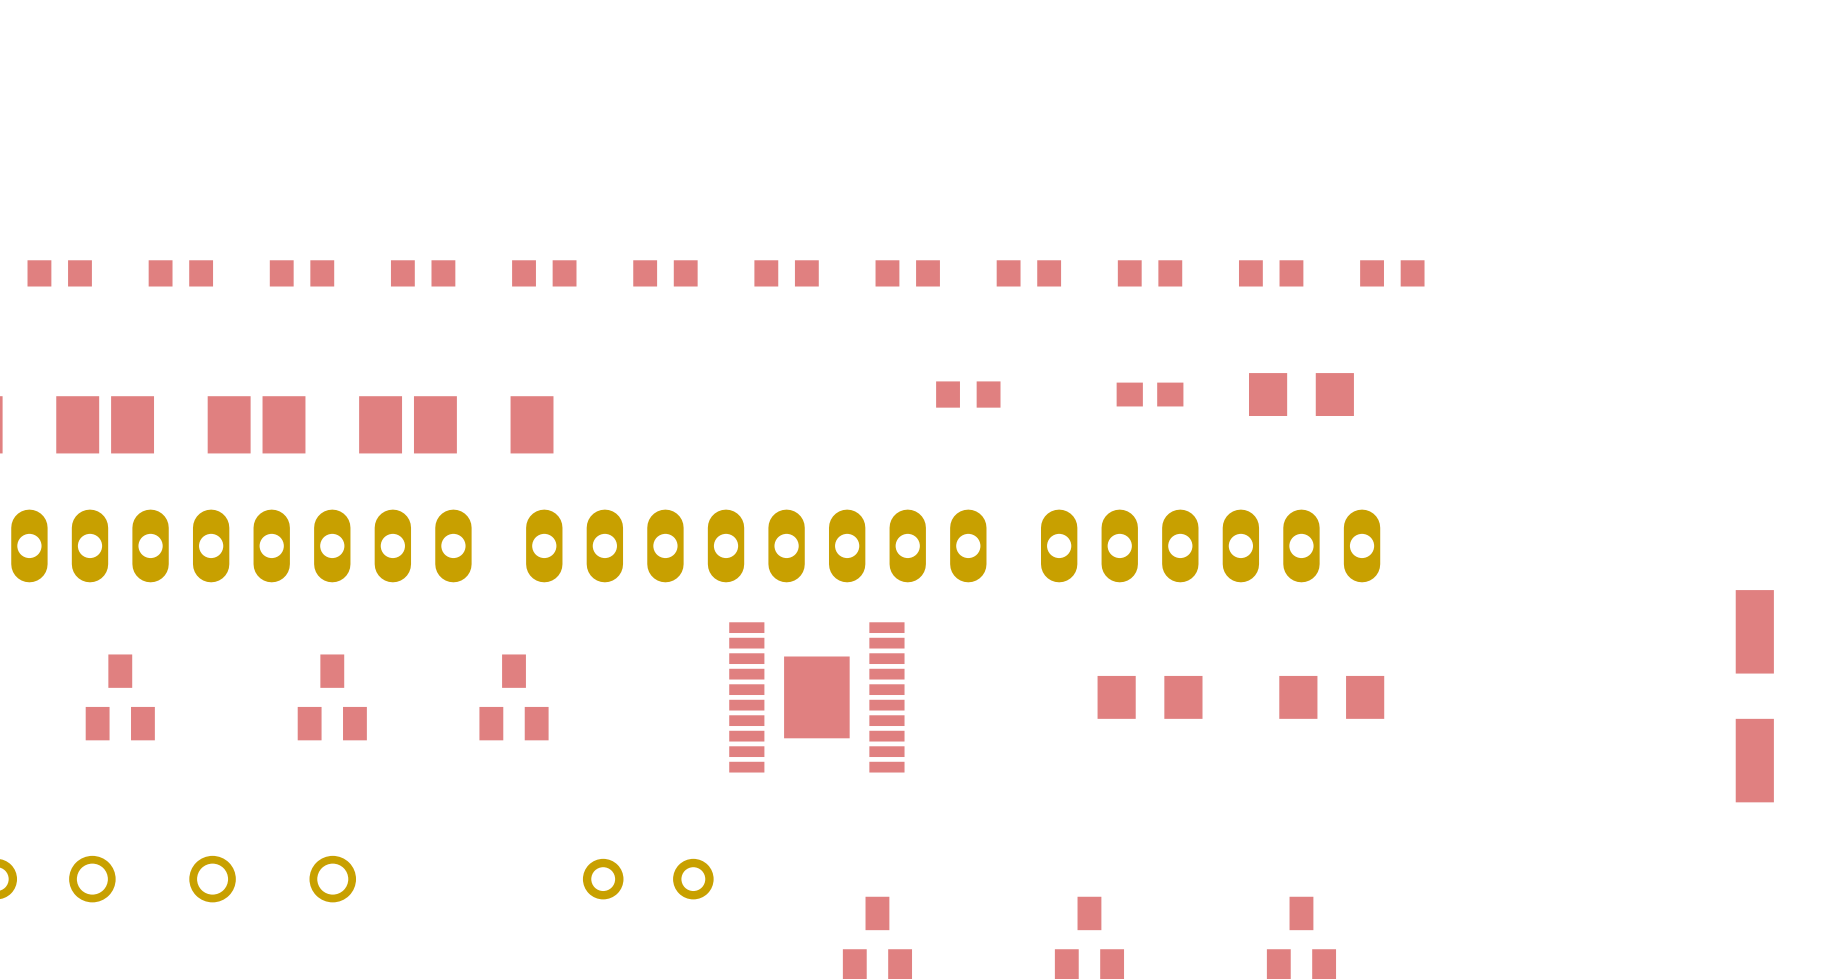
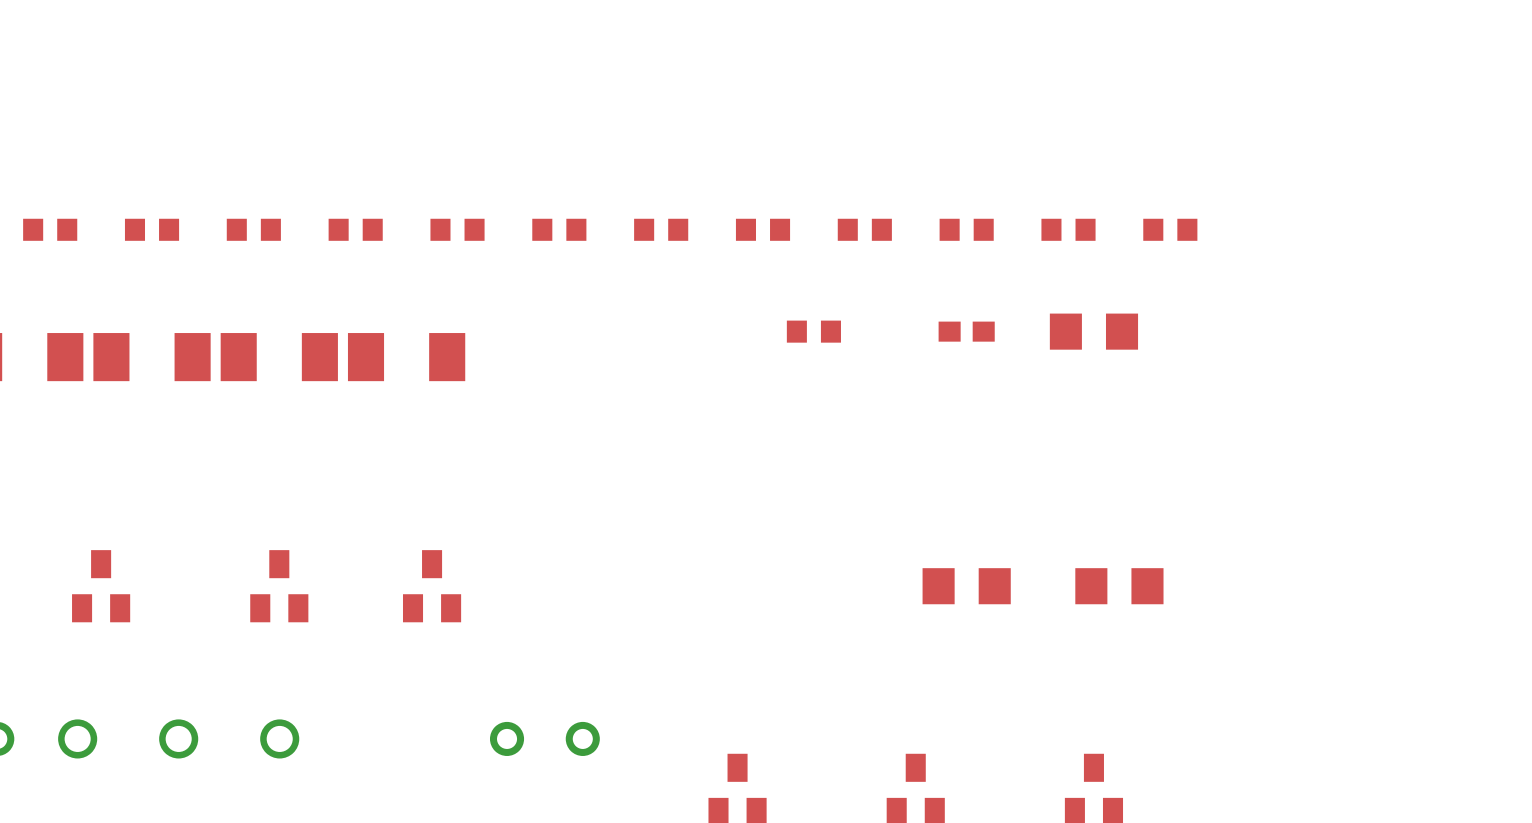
part: (241, 545) -> none
part: (756, 545) -> none
part: (1210, 545) -> none
part: (1754, 696) -> none
part: (816, 697) -> none

